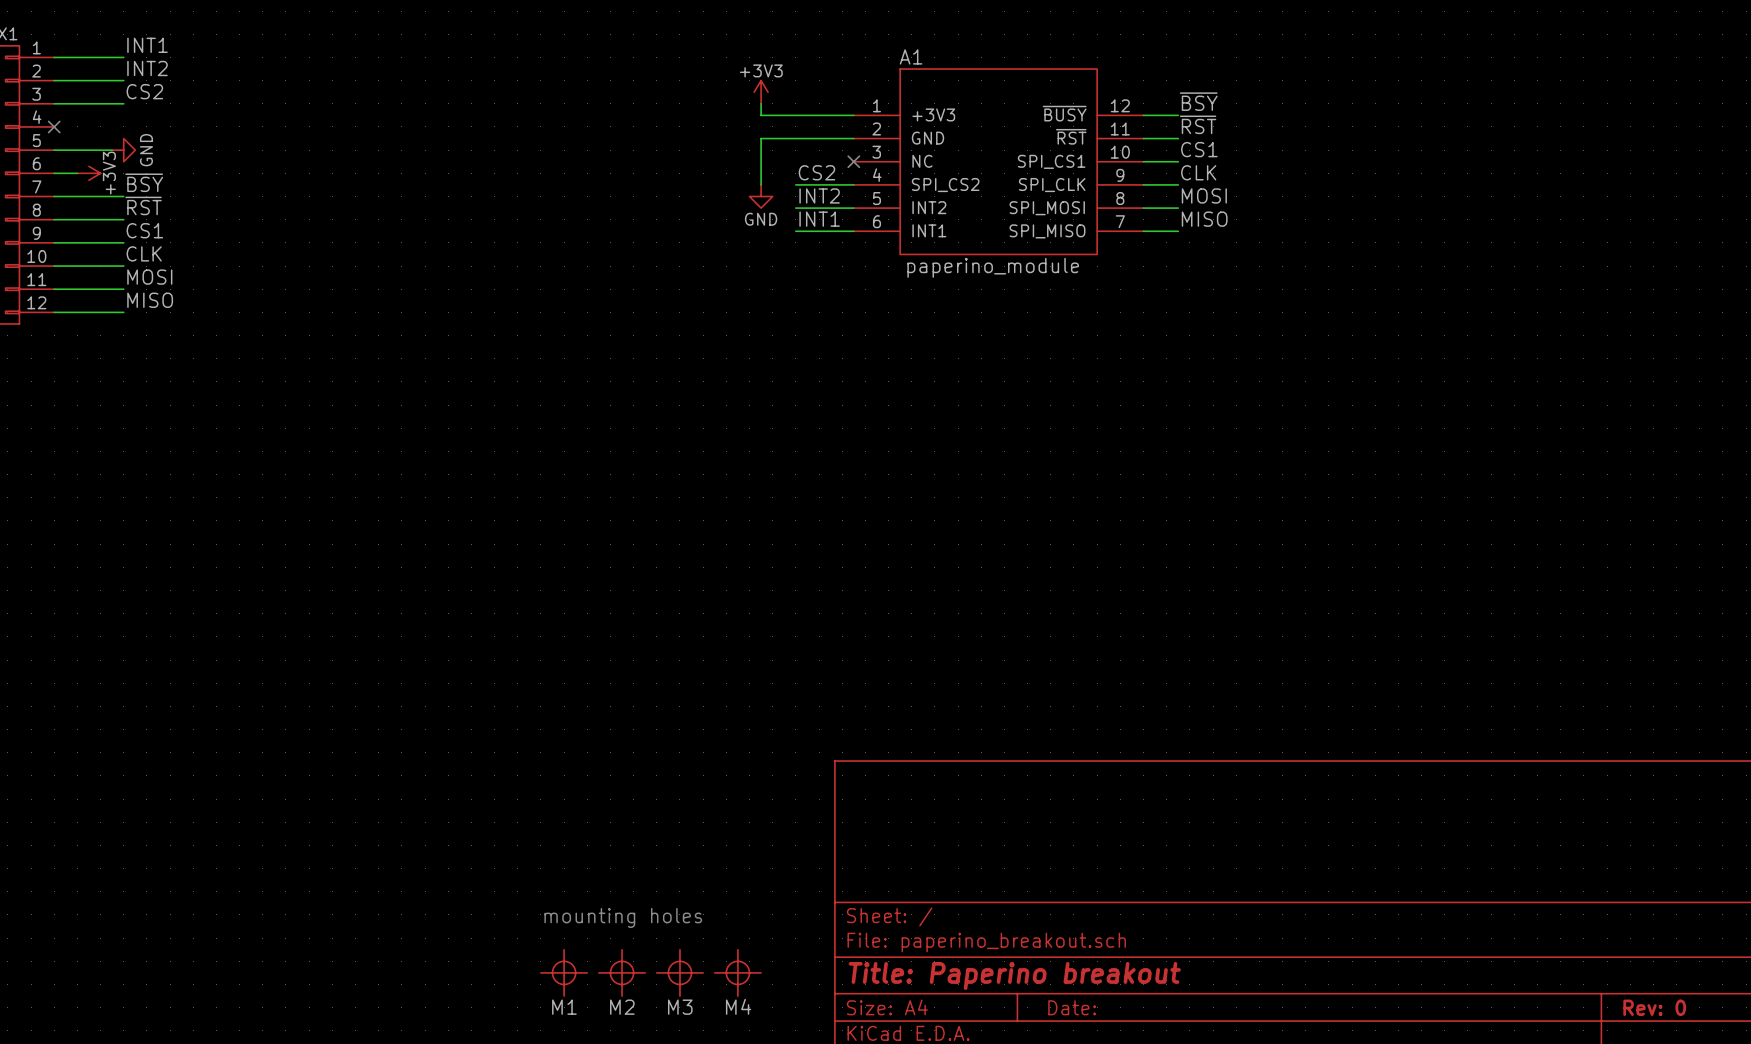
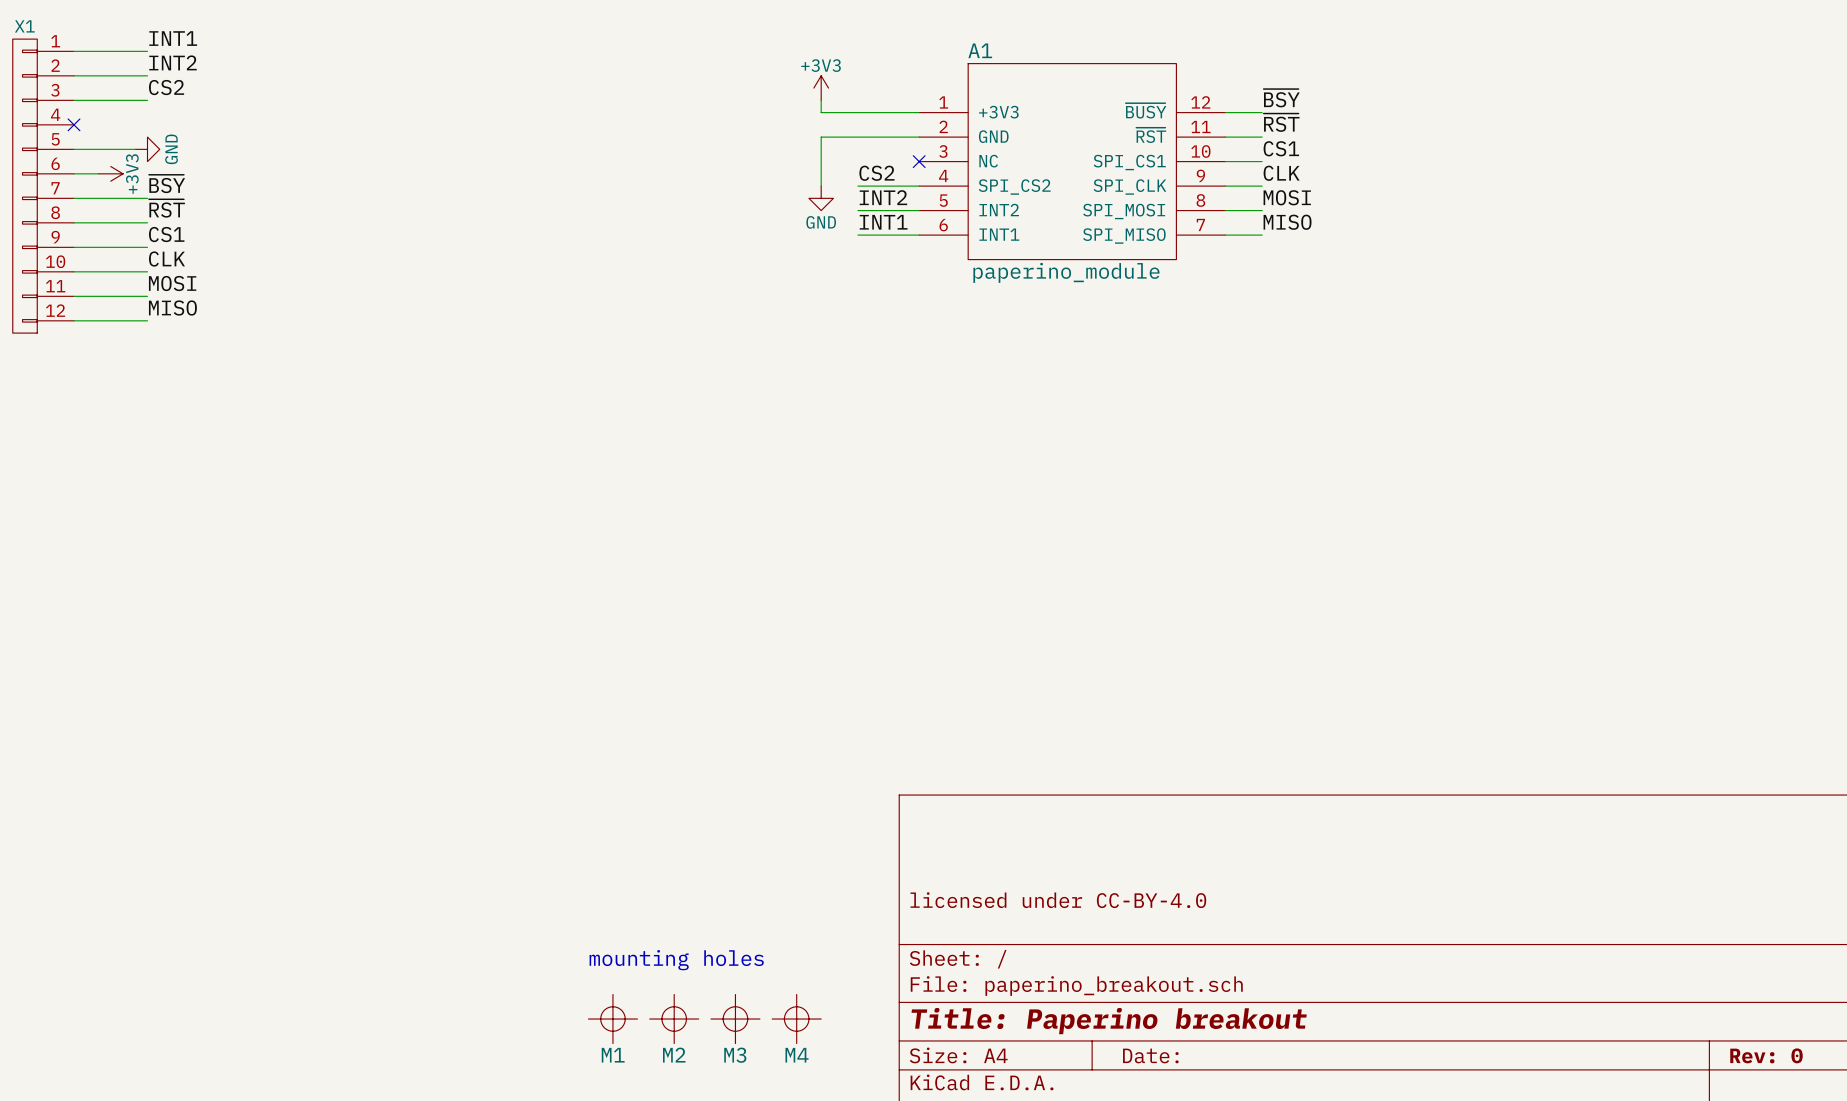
title block: none -> licensed under CC-BY-4.0 (1058, 900)

